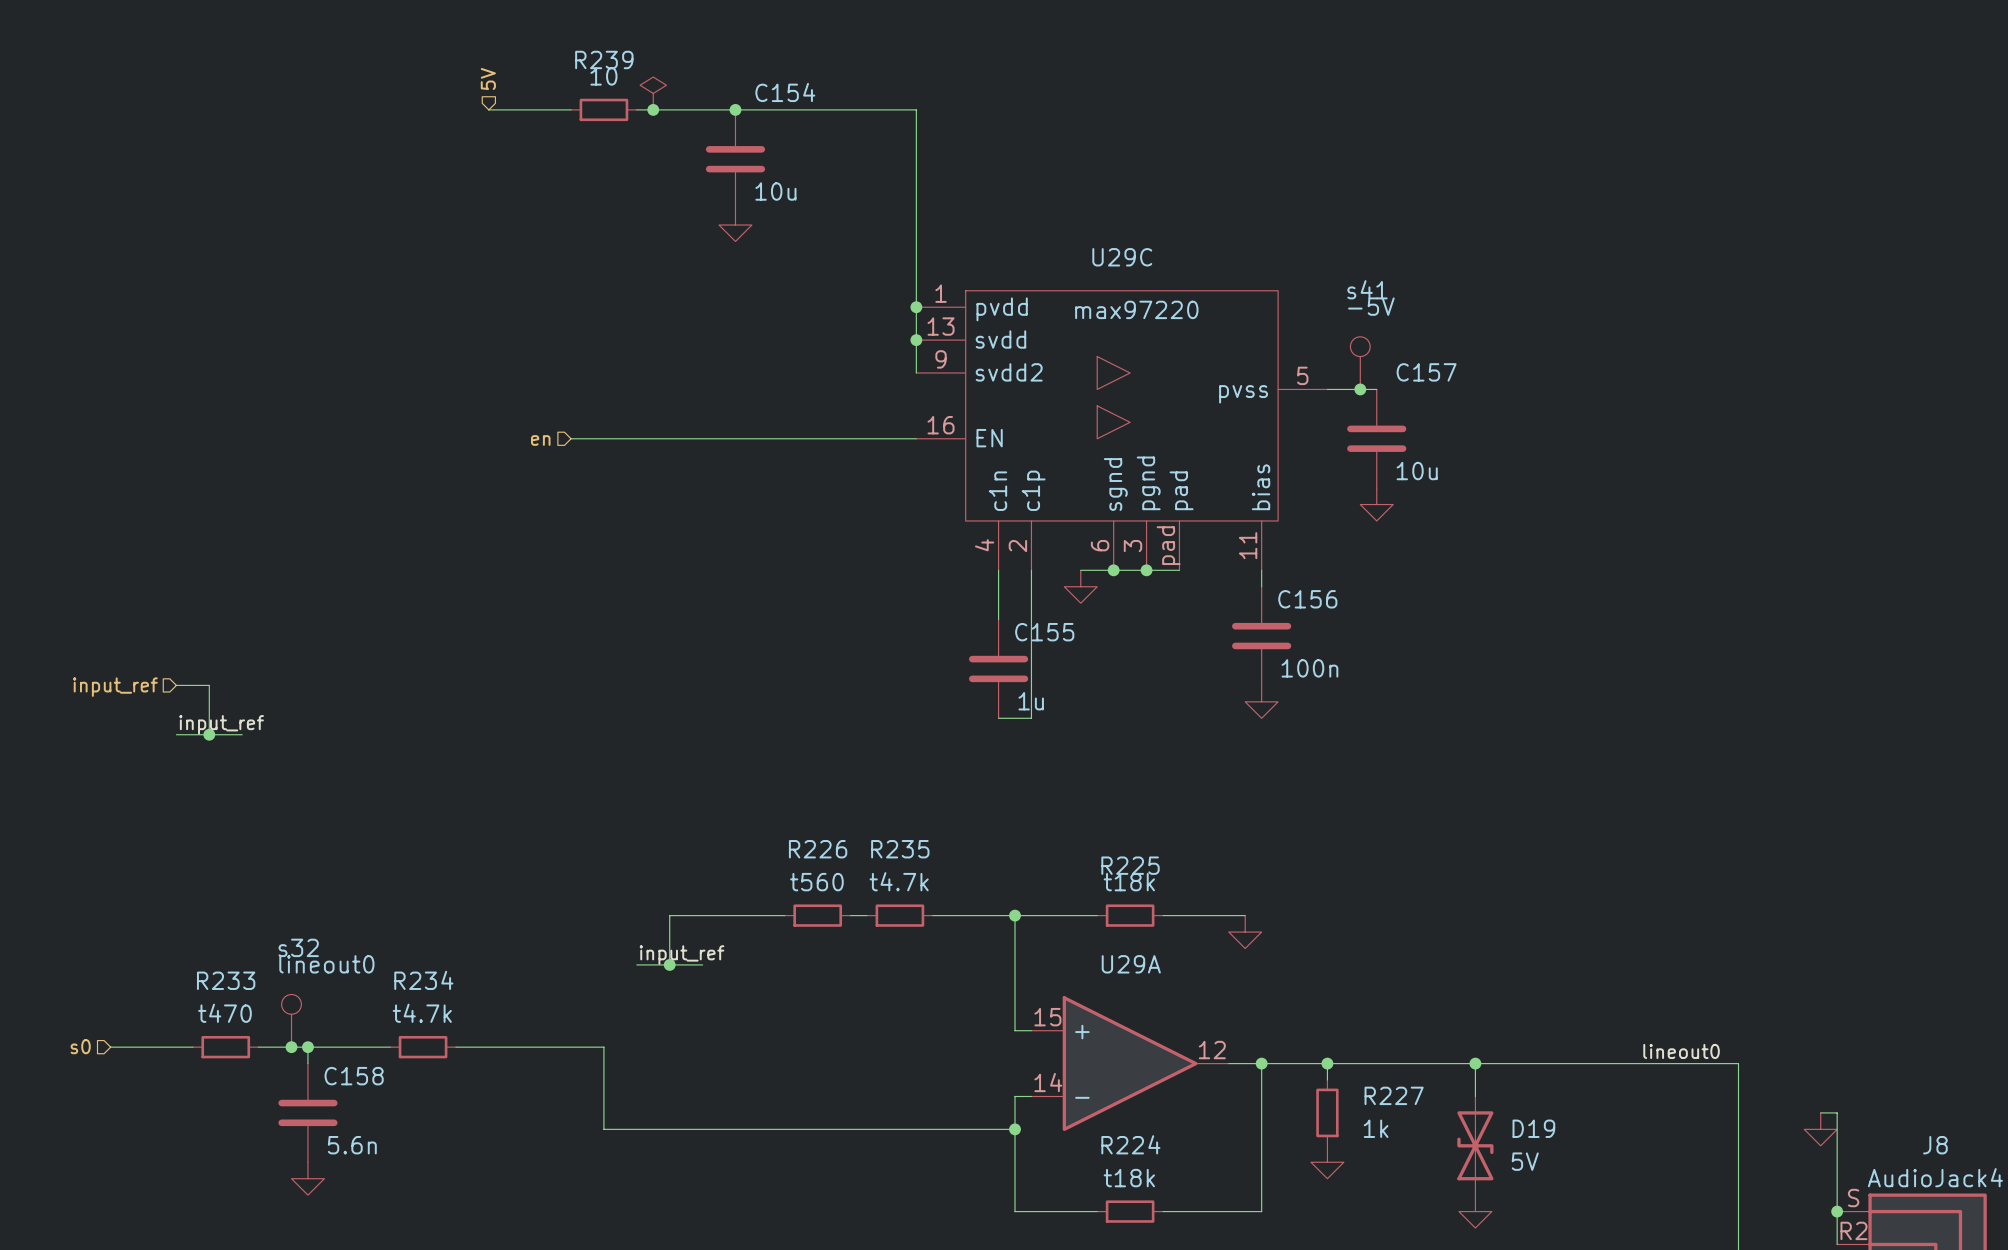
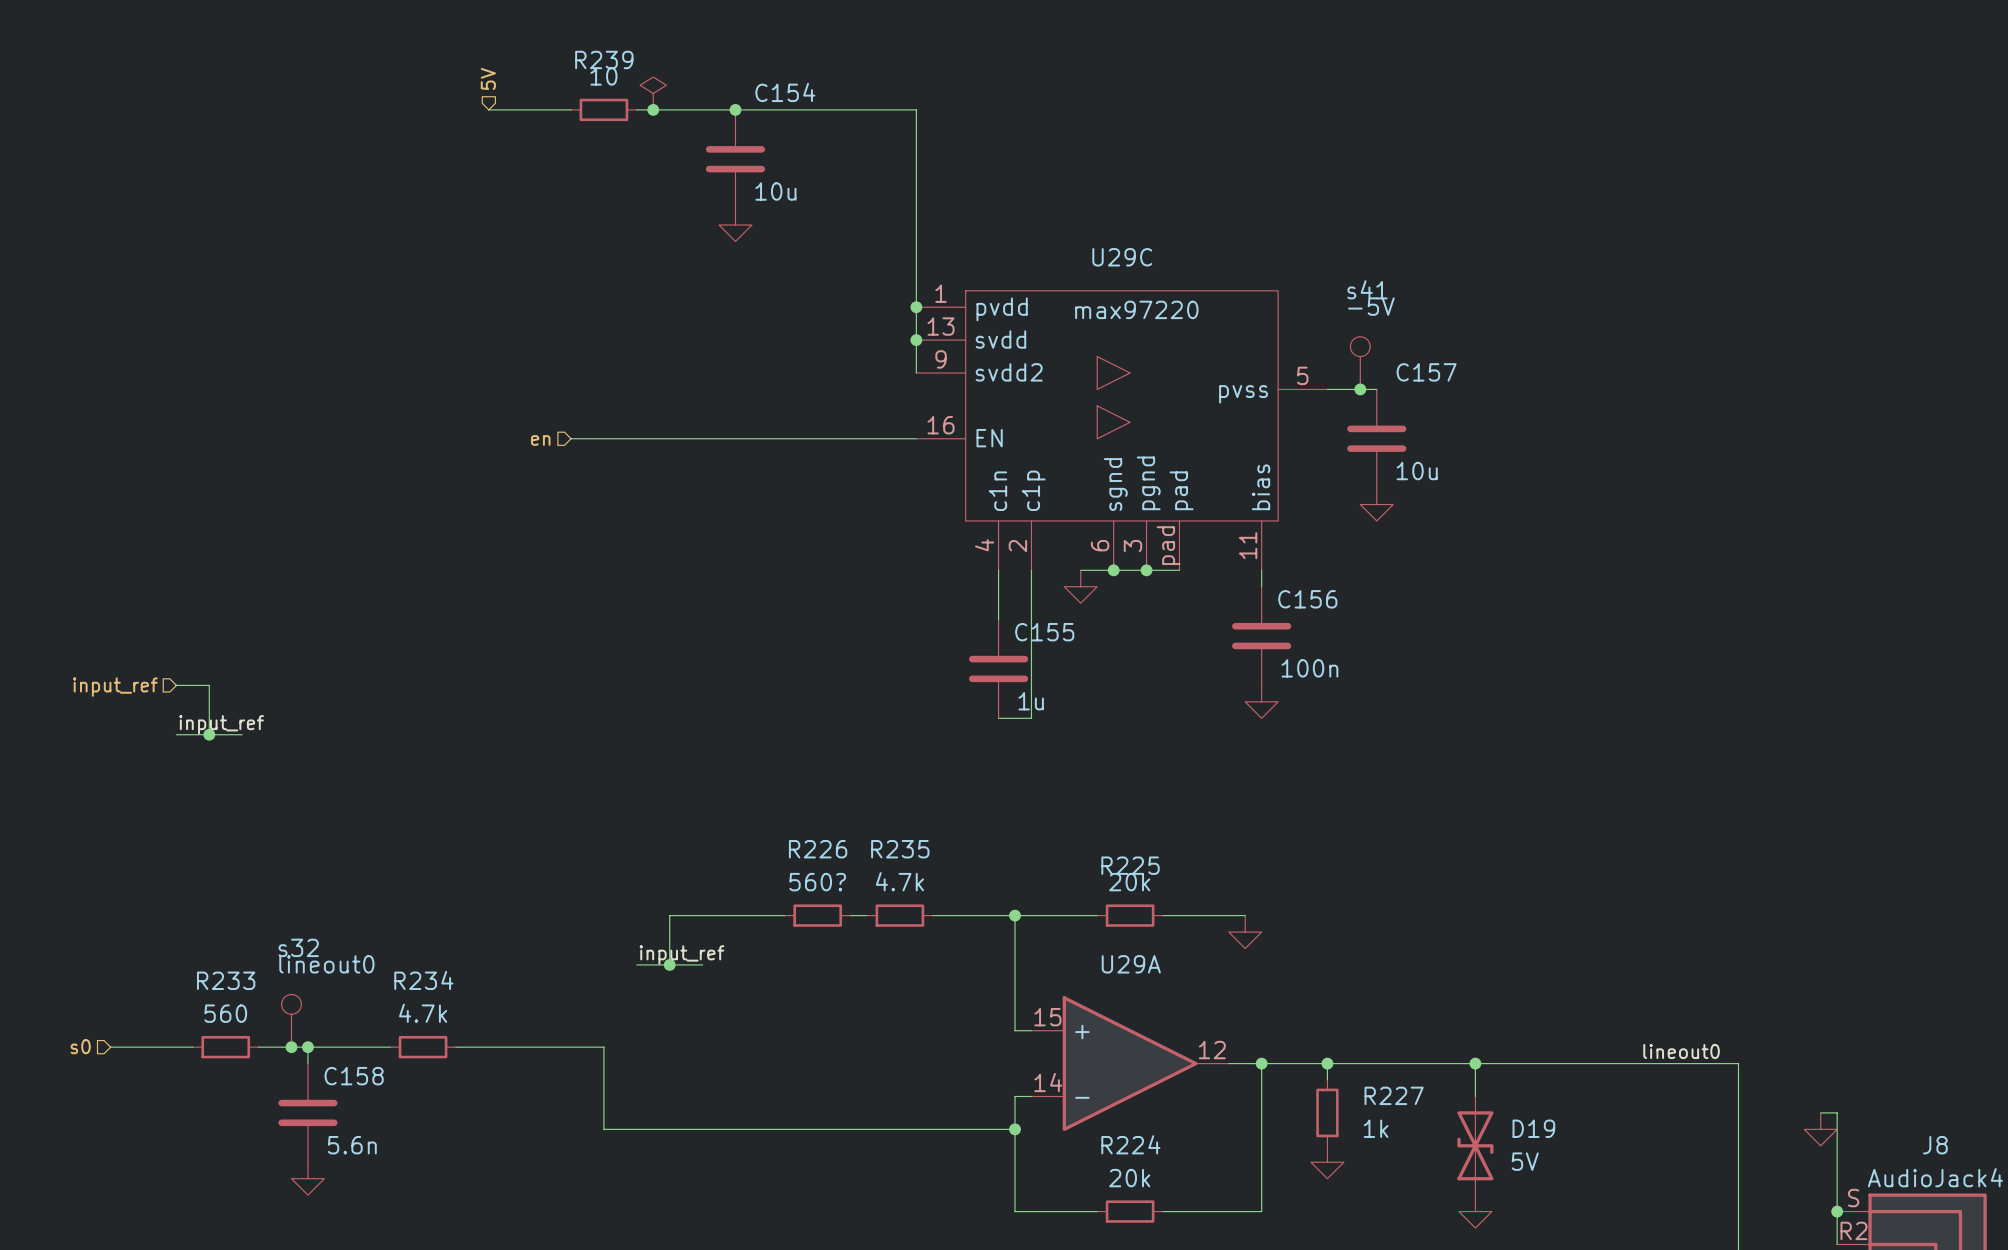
R235 value: t4.7k (899, 881) -> 4.7k (899, 881)
R226 value: t560 (816, 882) -> 560? (817, 882)
R225 value: t18k (1129, 882) -> 20k (1129, 882)
R233 value: t470 (224, 1013) -> 560 (225, 1013)
R234 value: t4.7k (422, 1013) -> 4.7k (423, 1013)
R224 value: t18k (1129, 1178) -> 20k (1129, 1178)

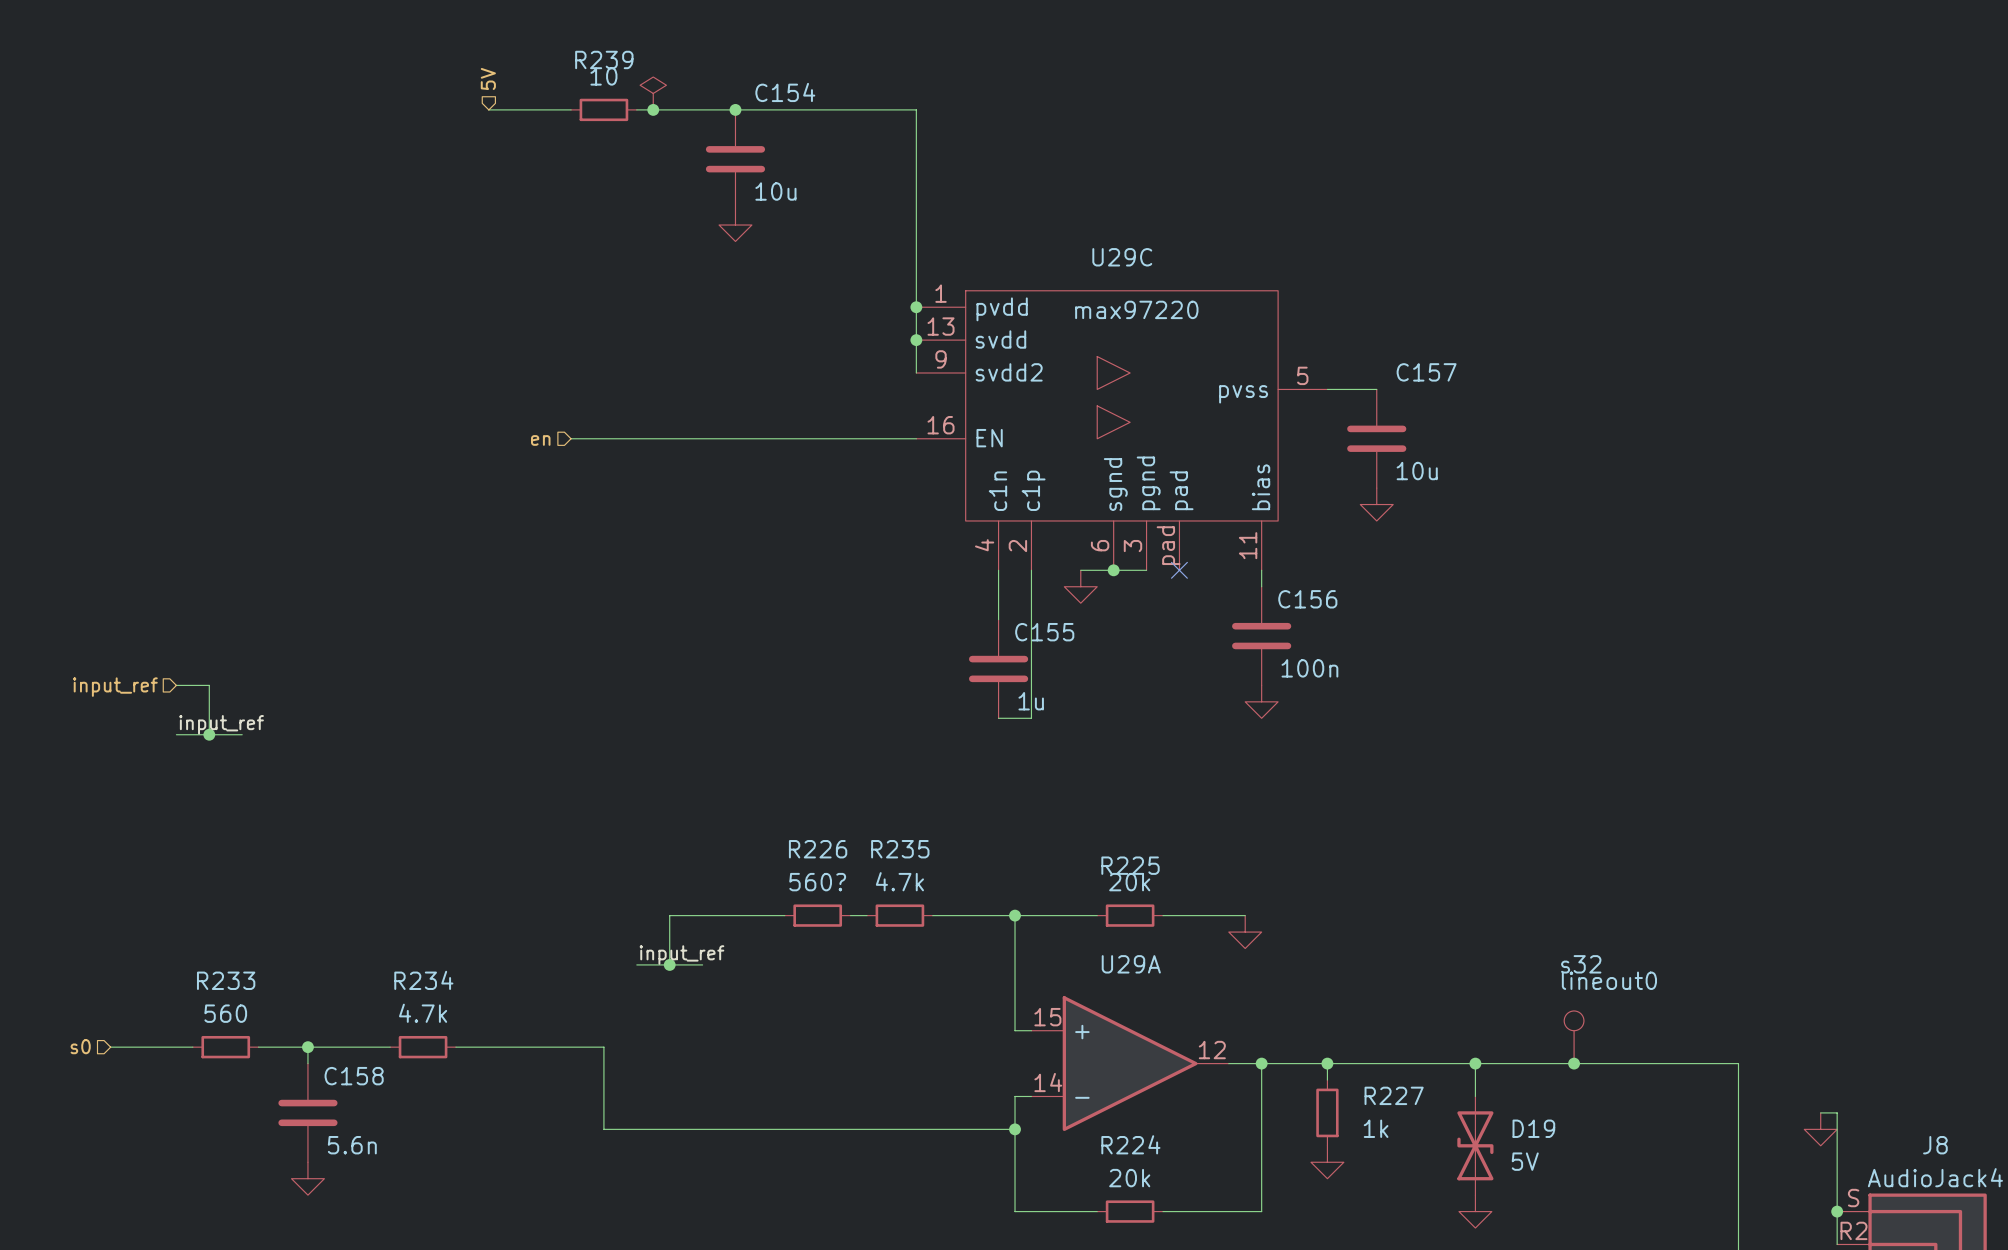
s41: -5V (1360, 363) -> none
junction: (1360, 389) -> none
wire: (1146, 570) (1179, 570) -> none
junction: (1146, 570) -> none
no-connect mark: none -> (1179, 570)
s32 position: (291, 1020) -> (1574, 1037)
junction: (291, 1047) -> none
label: lineout0 (1681, 1051) -> none
junction: none -> (1574, 1063)

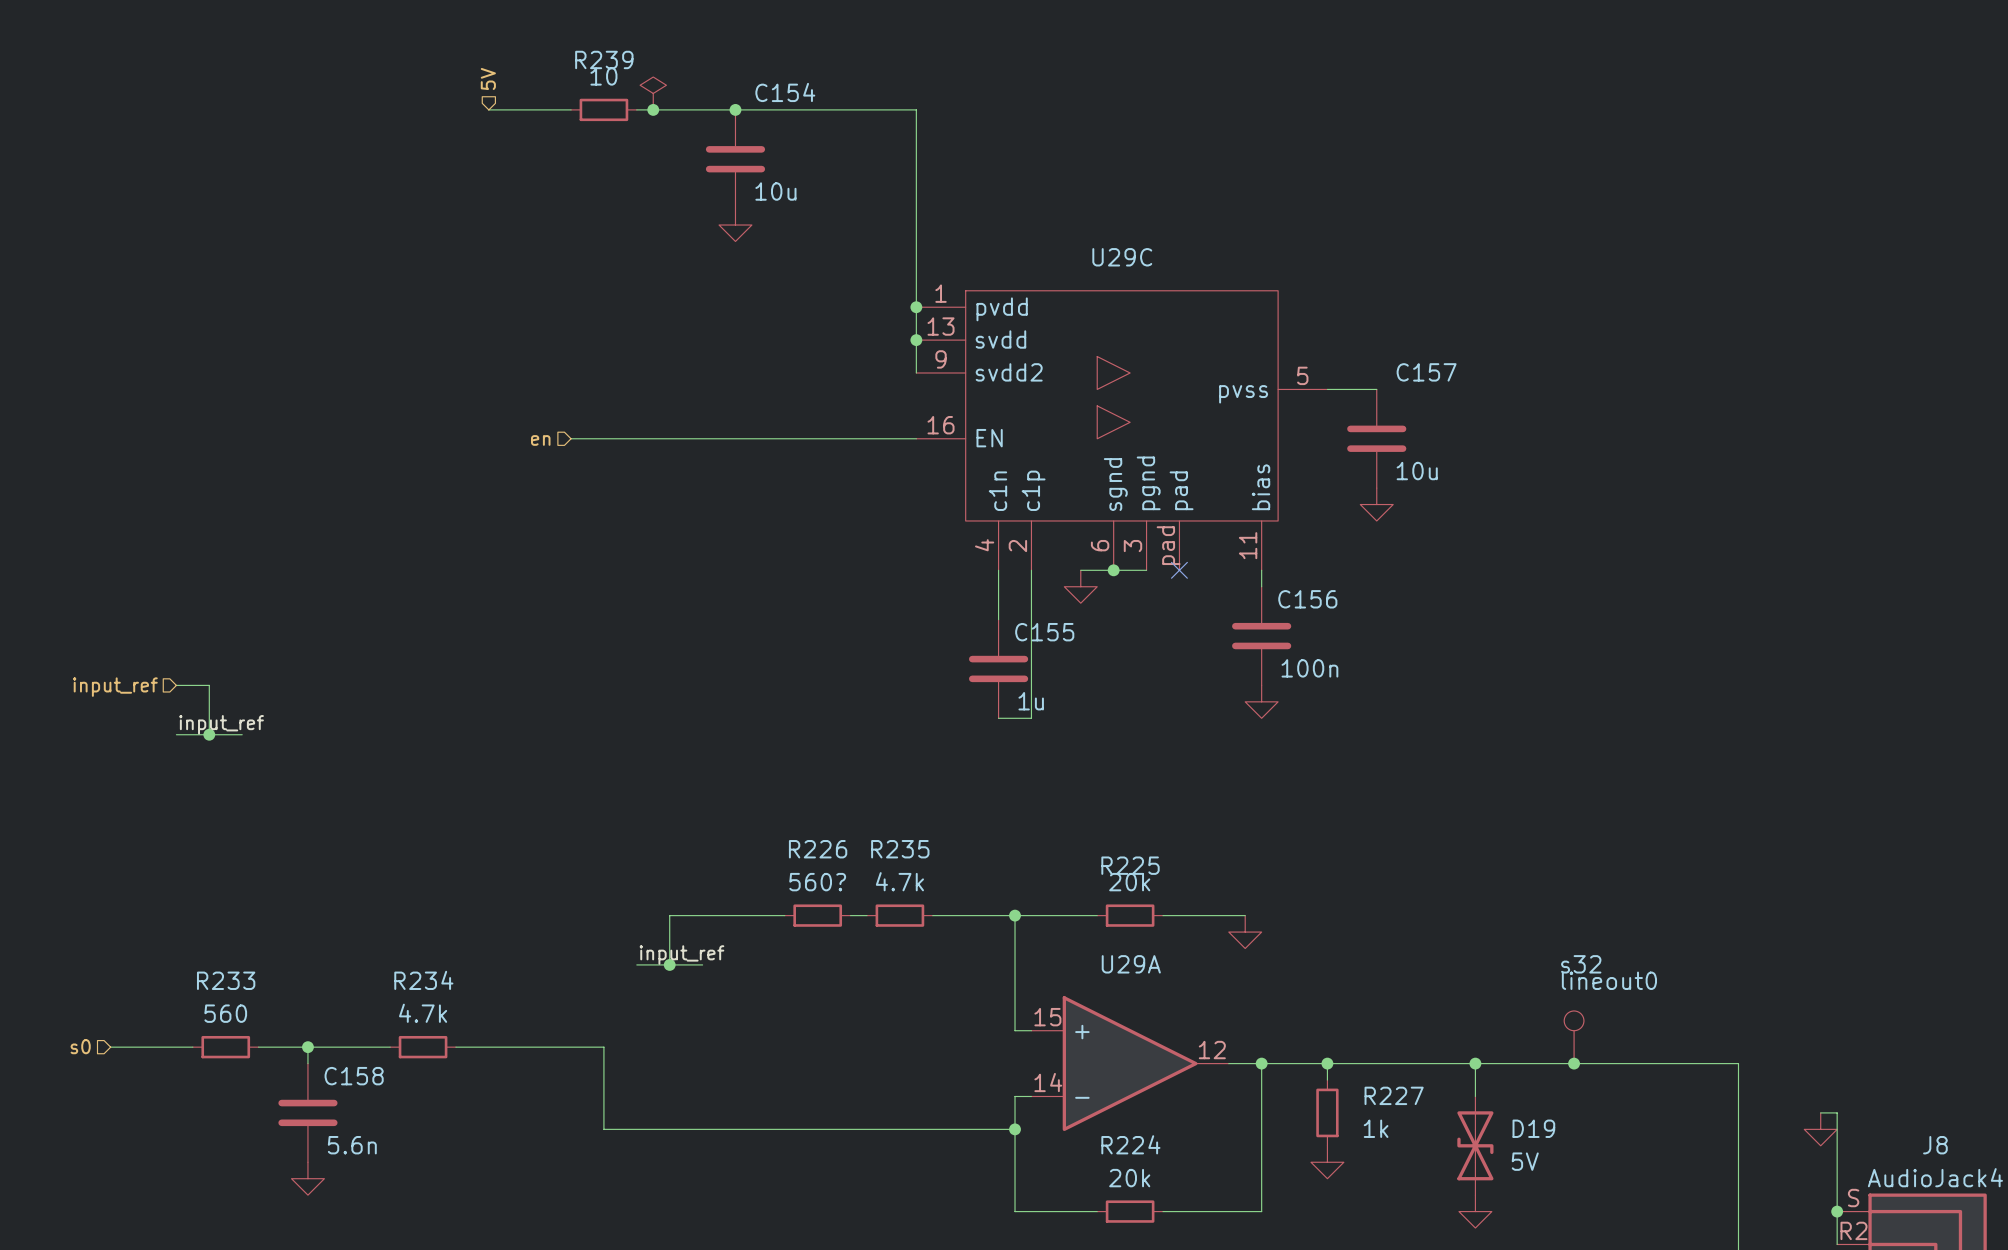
U29C value: max97220 (1136, 309) -> none

